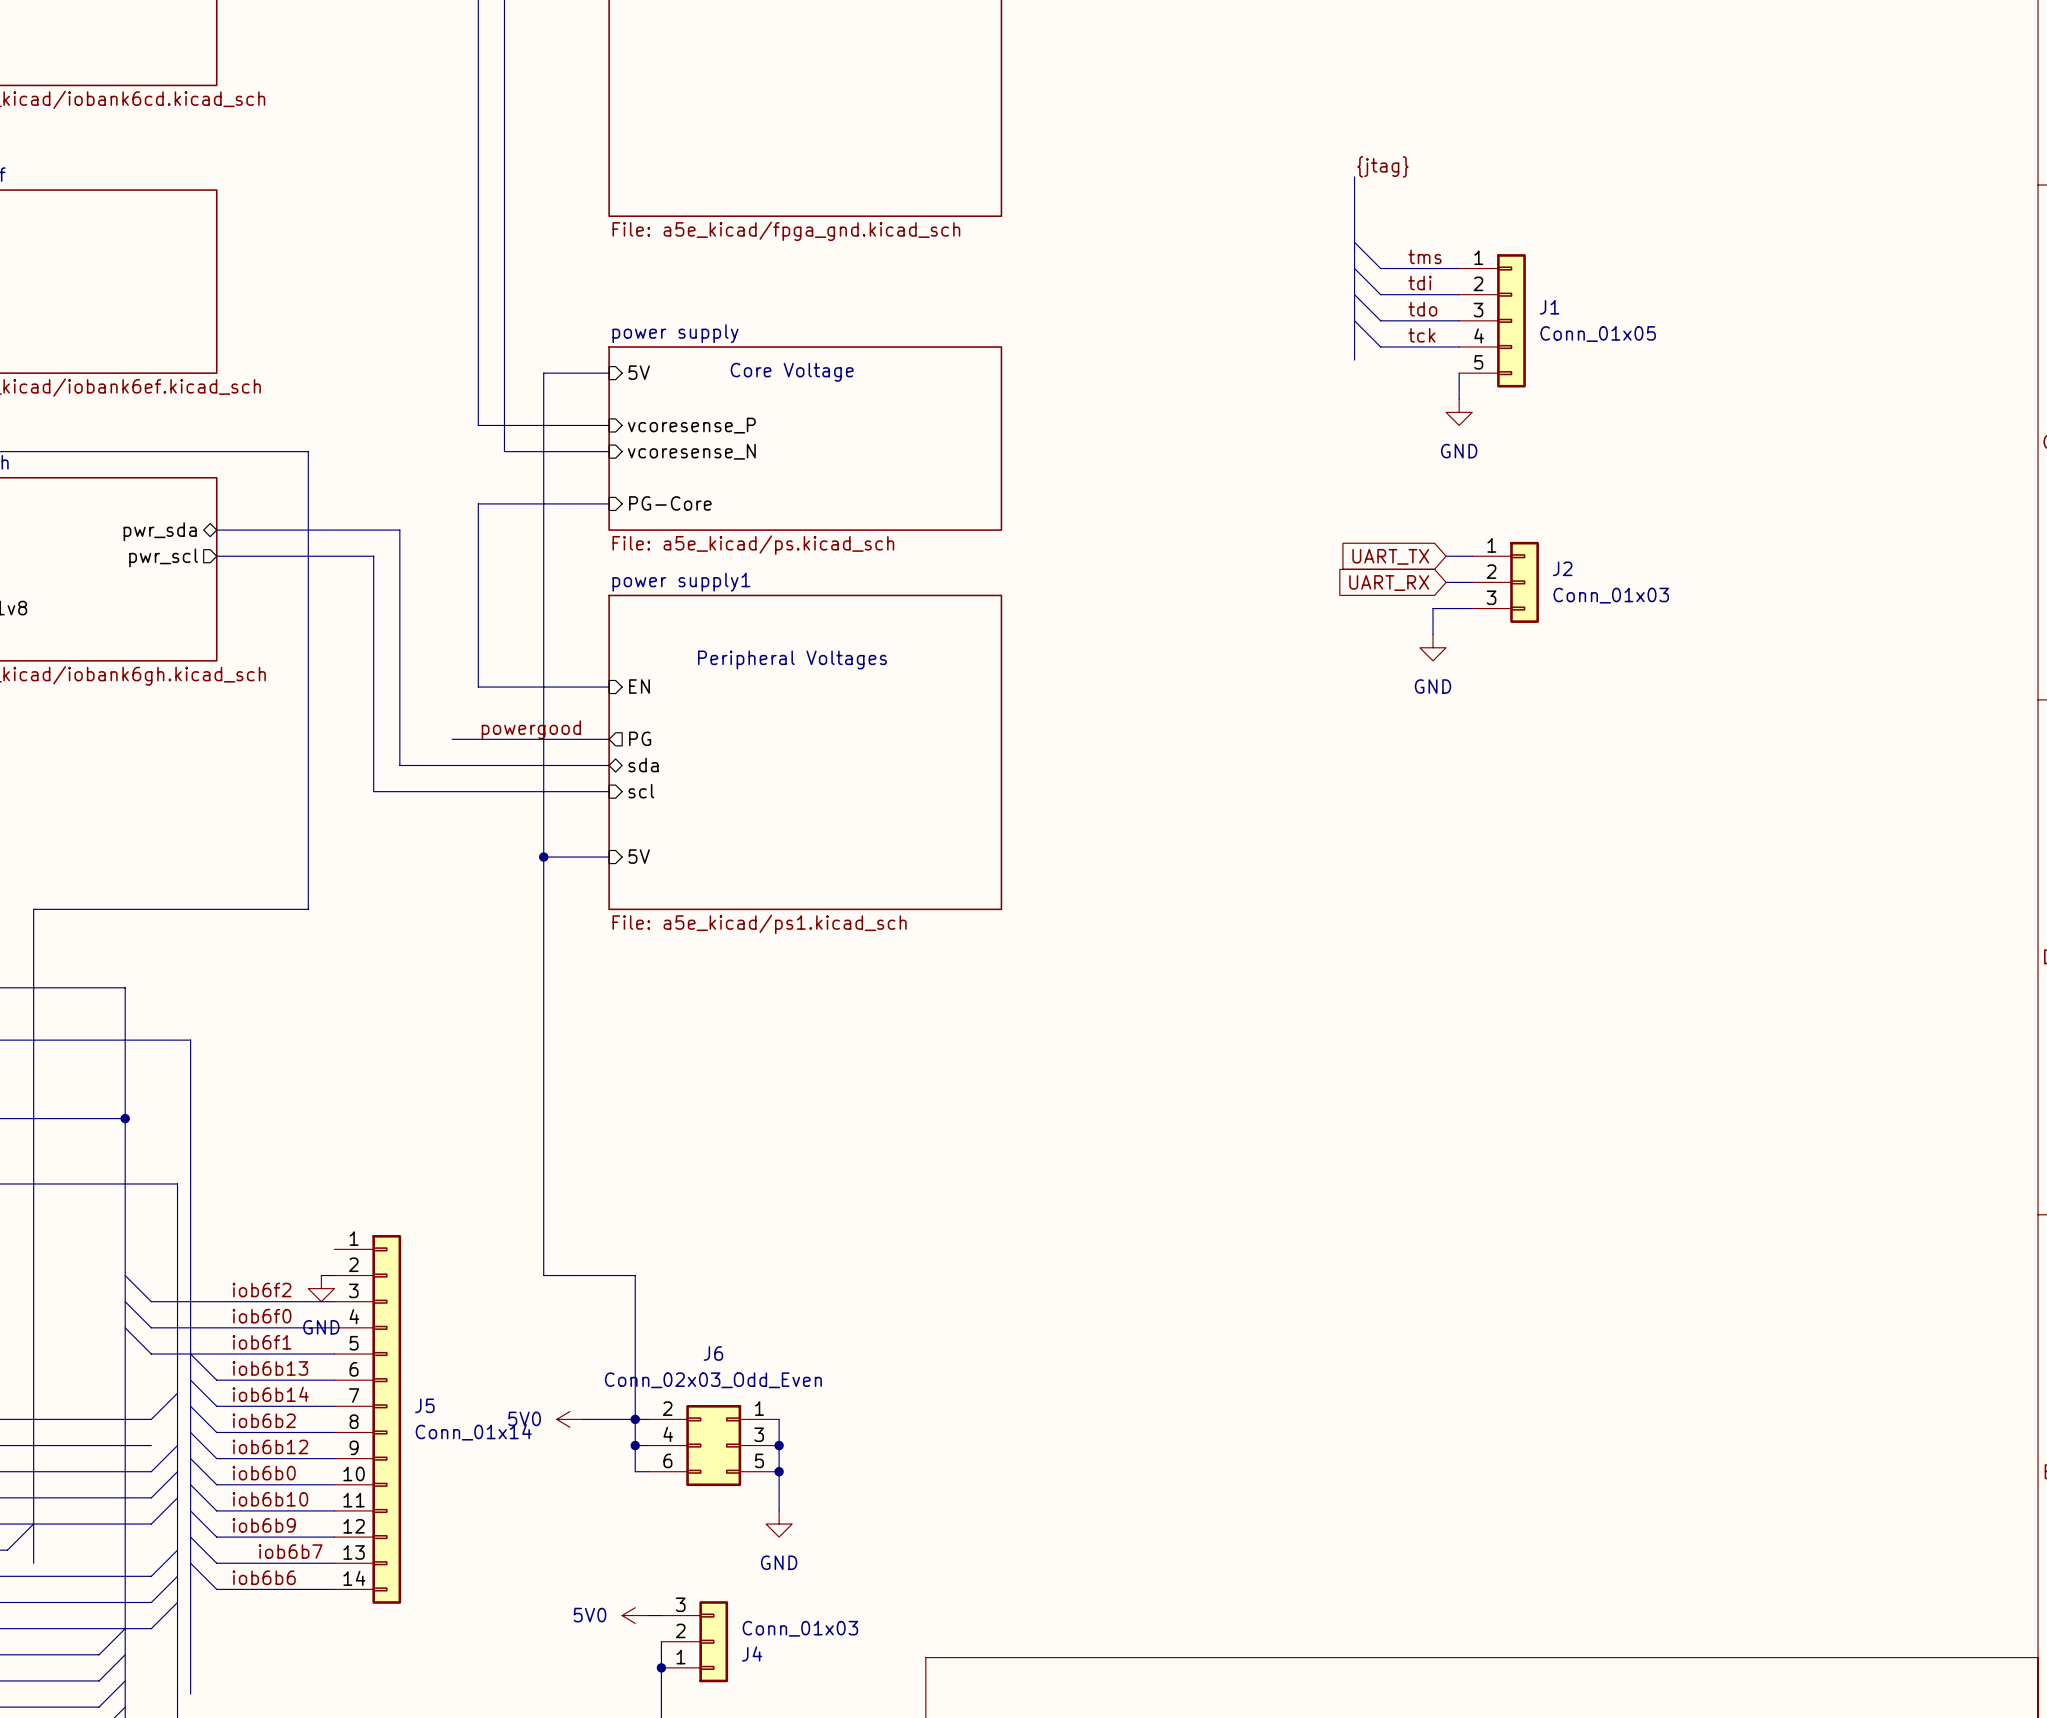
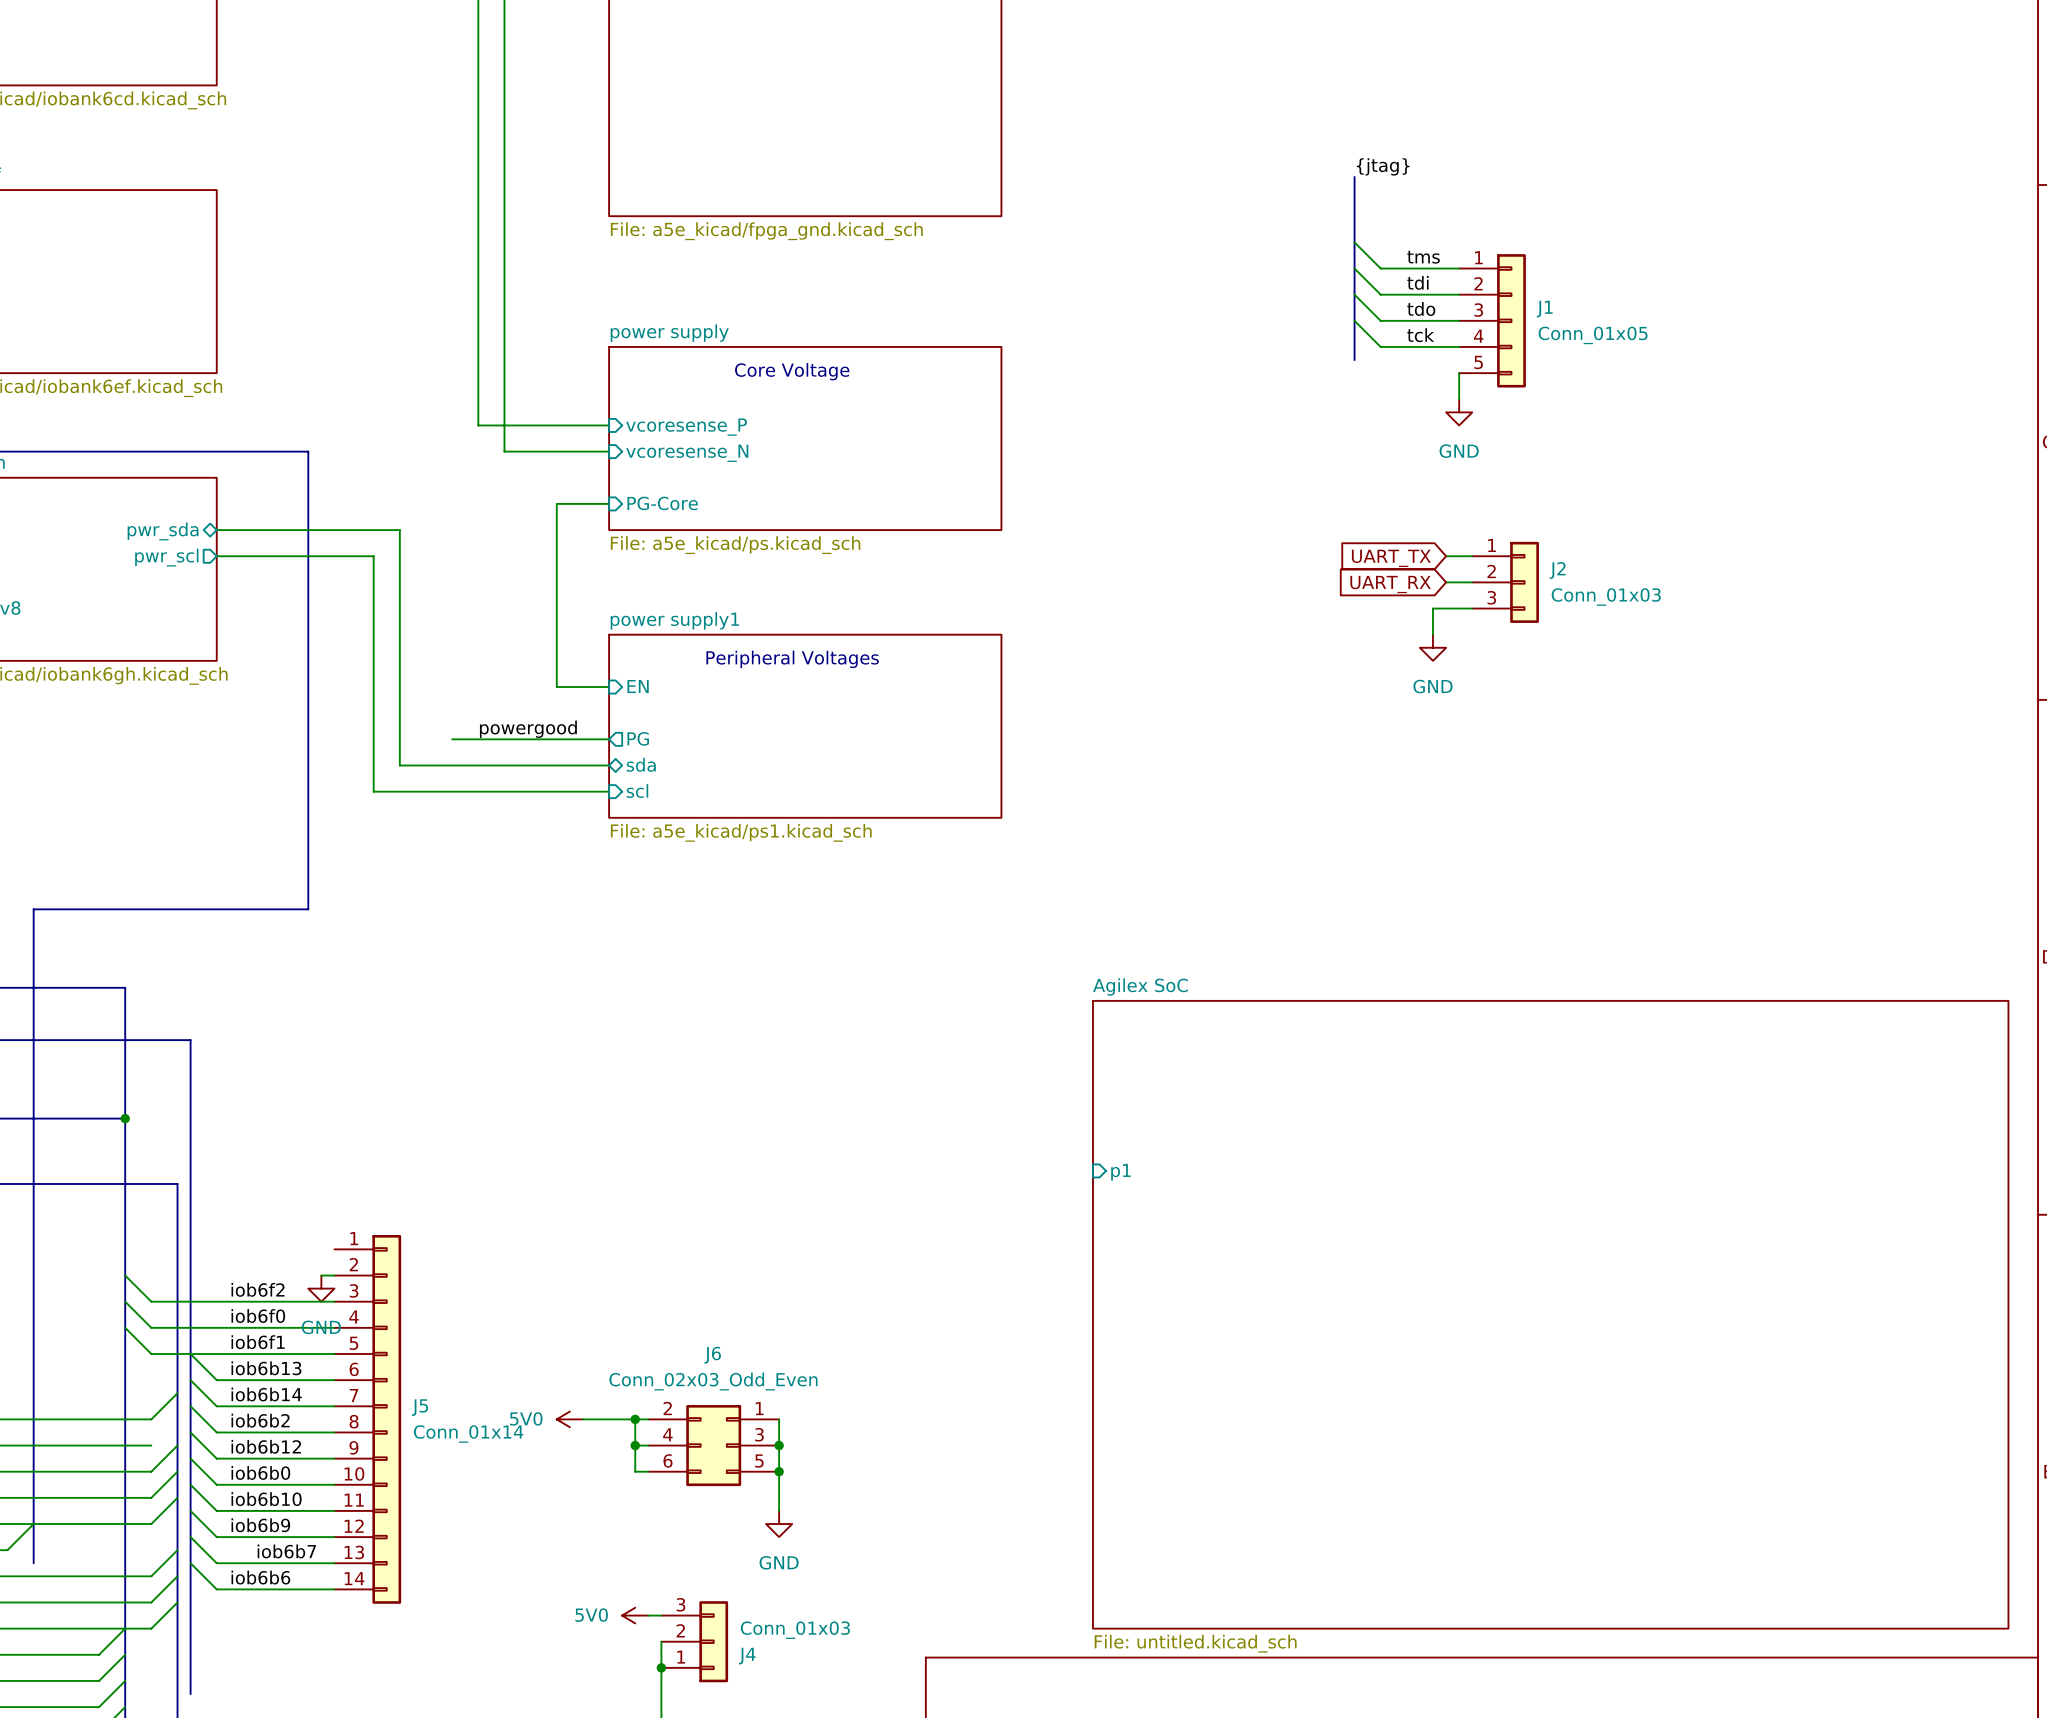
sheet pin: 5V (639, 372) -> none
wire: (609, 373) (543, 373) (543, 1275) (635, 1275) (635, 1419) -> none
wire: (556, 503) (478, 503) (478, 687) (556, 687) -> (556, 503) (556, 687)
sheet power supply1 name position: power supply1 (681, 582) -> power supply1 (674, 620)
sheet power supply1 shape: [608, 594, 1003, 911] -> [608, 633, 1003, 819]
sheet pin: 5V (639, 856) -> none
wire: (543, 857) (609, 857) -> none
junction: (543, 857) -> none
sheet power supply1 value position: File: a5e_kicad/ps1.kicad_sch (759, 924) -> File: a5e_kicad/ps1.kicad_sch (741, 832)
sheet pin: none -> p1 (1120, 1172)
sheet Agilex SoC: none -> File: untitled.kicad_sch (1550, 1314)

